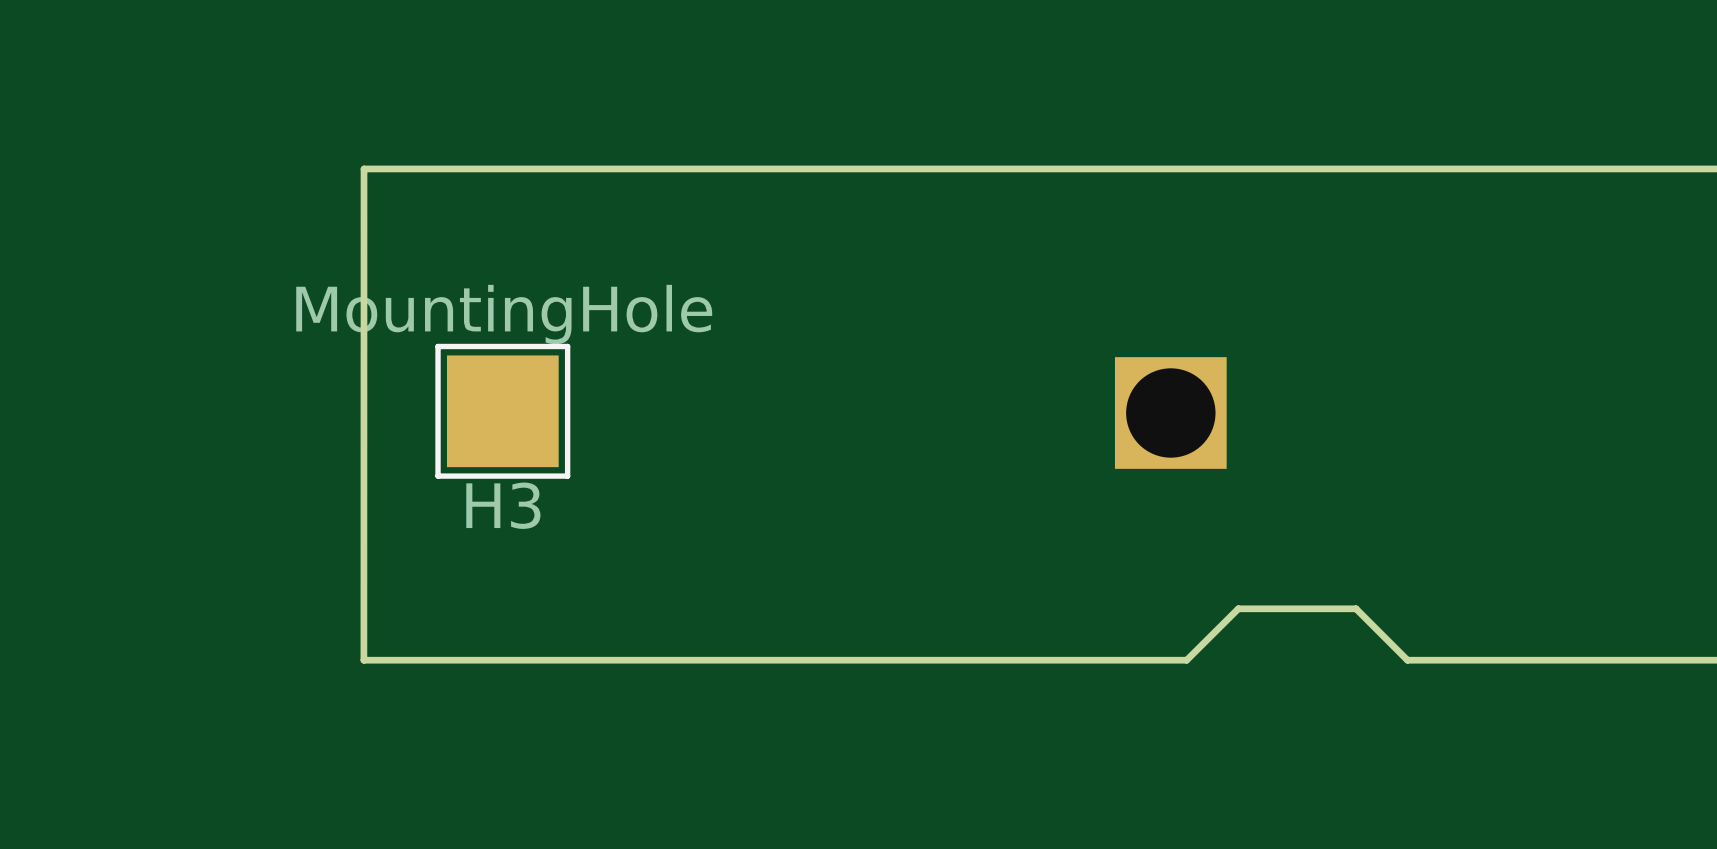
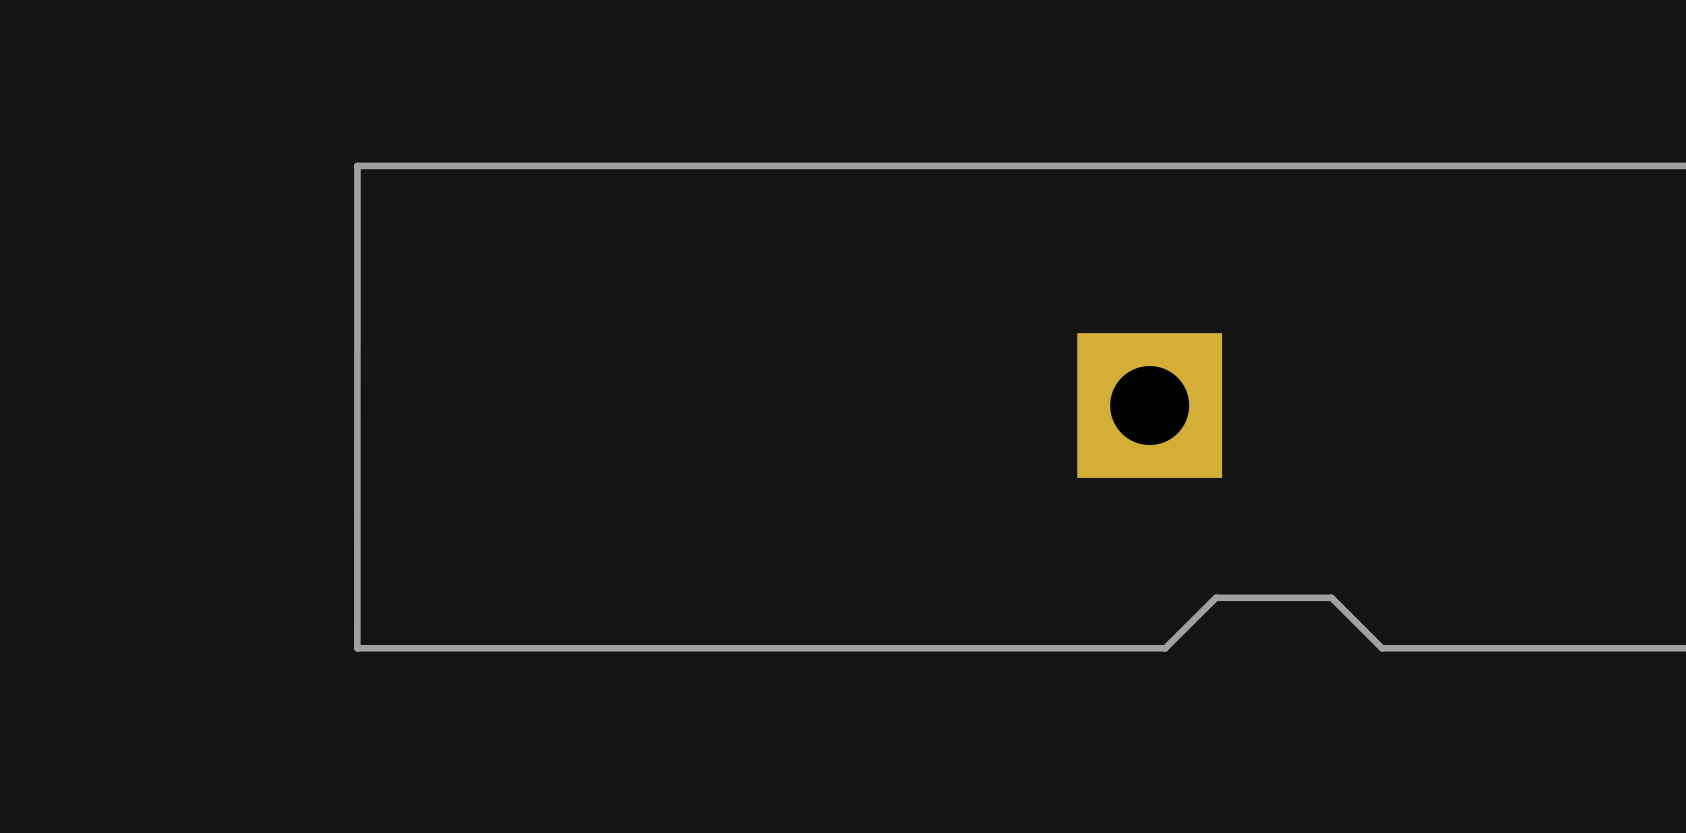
part footprint: [1114, 357, 1227, 469] -> [1077, 333, 1223, 478]
H3: MountingHole (502, 411) -> none

